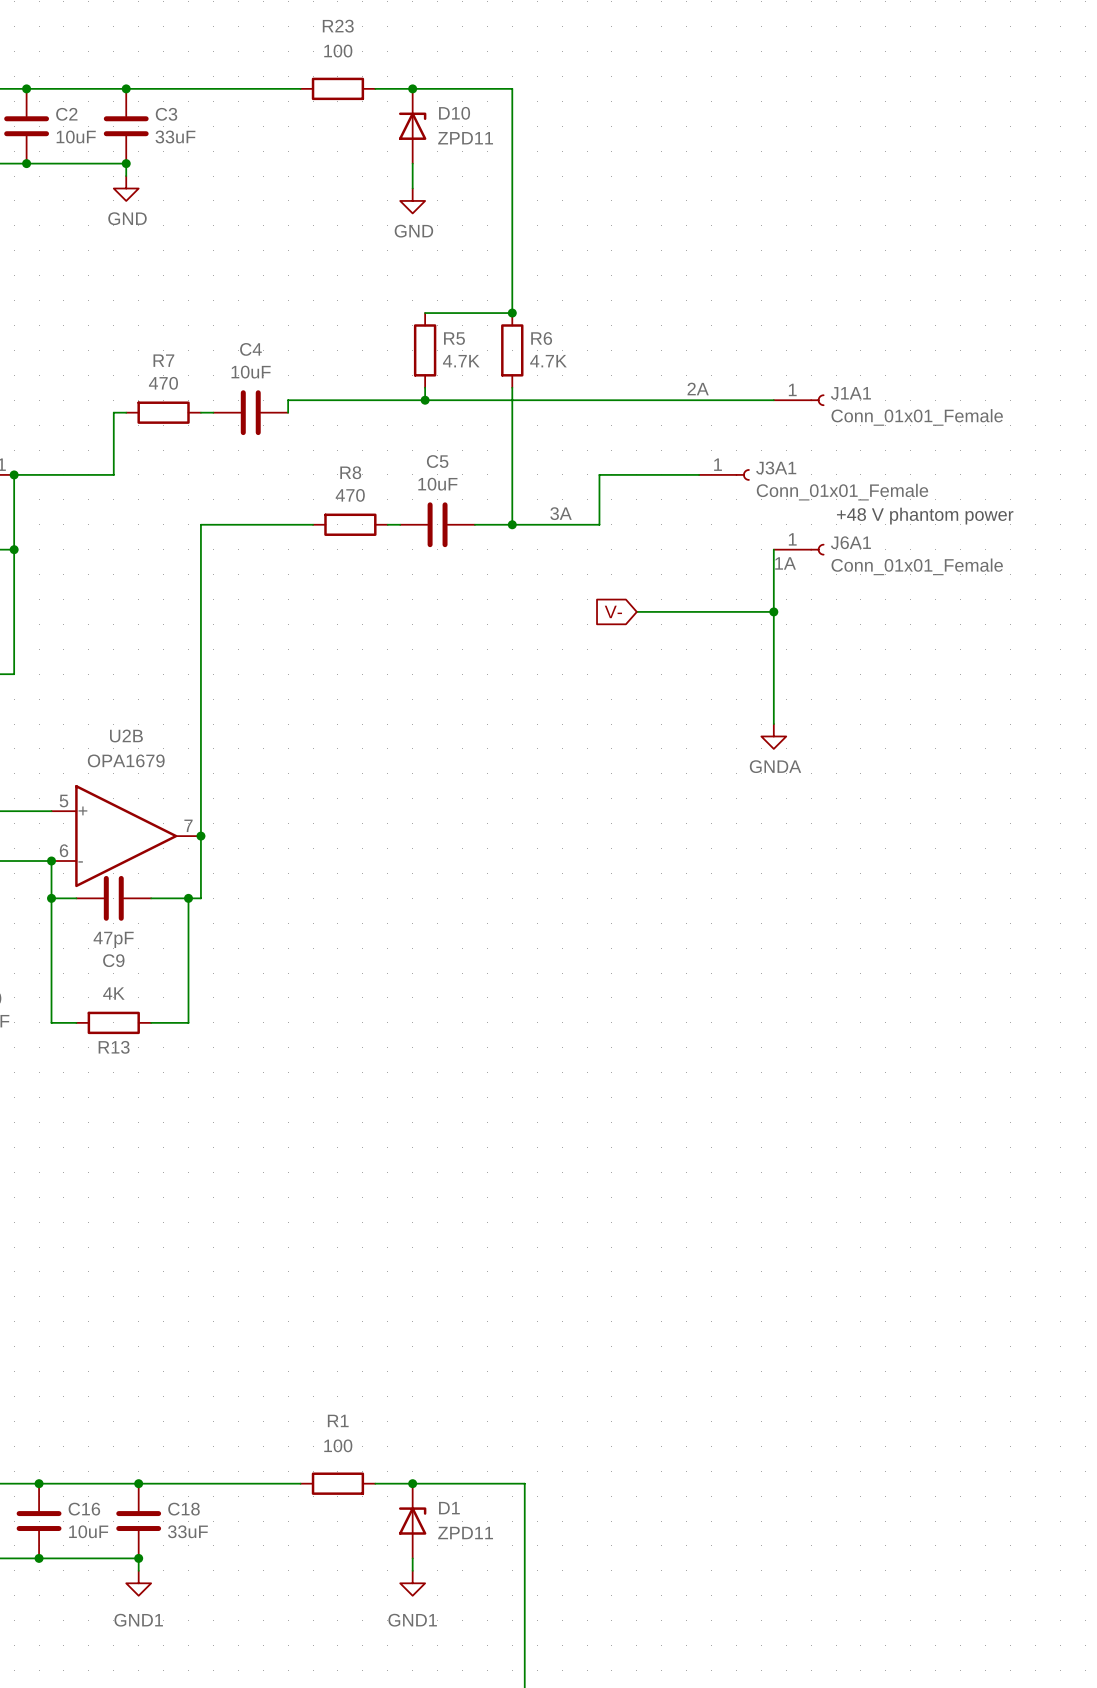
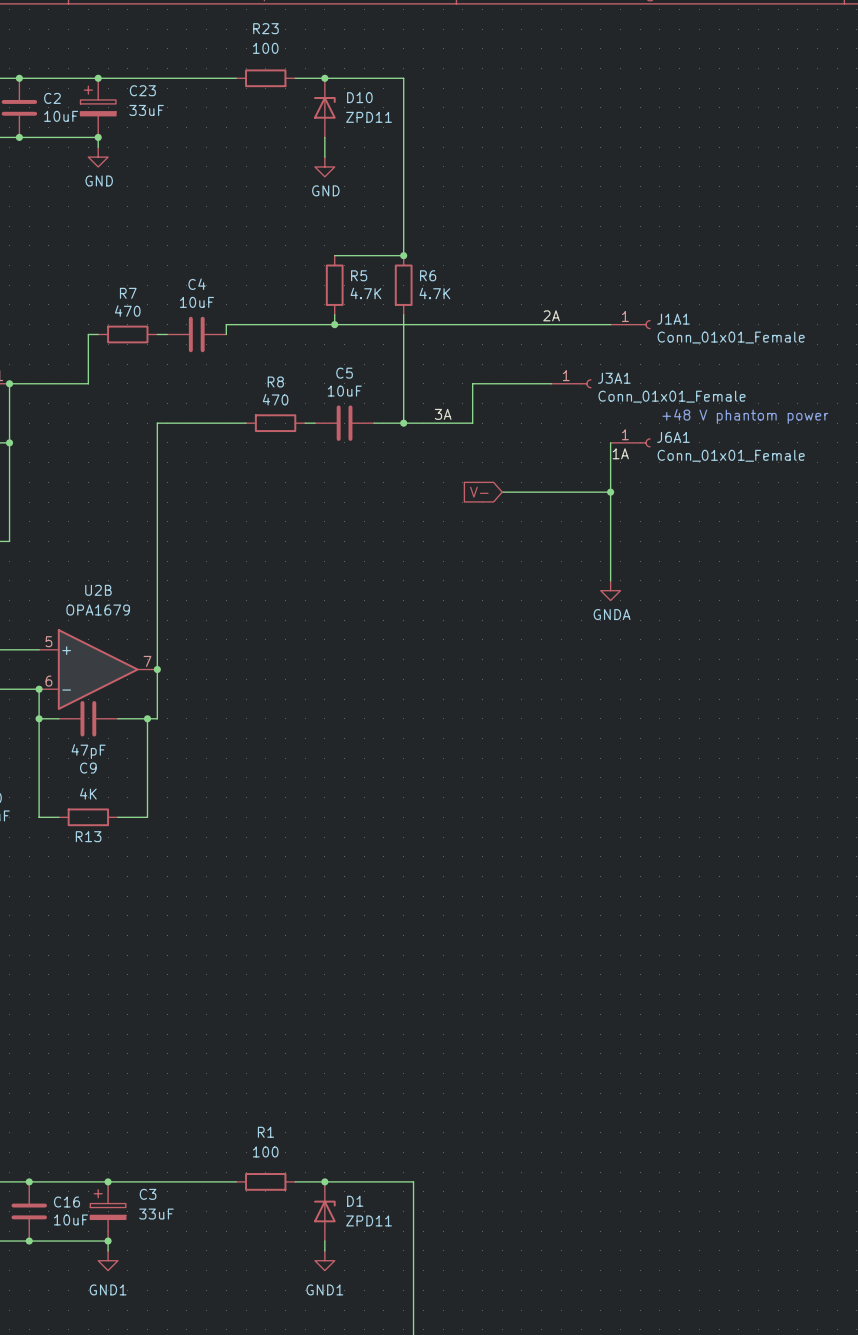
C3 symbol: [103, 88, 149, 164] -> [90, 1181, 126, 1242]
C23: none -> 33uF (98, 107)
C18: 33uF (138, 1521) -> none

